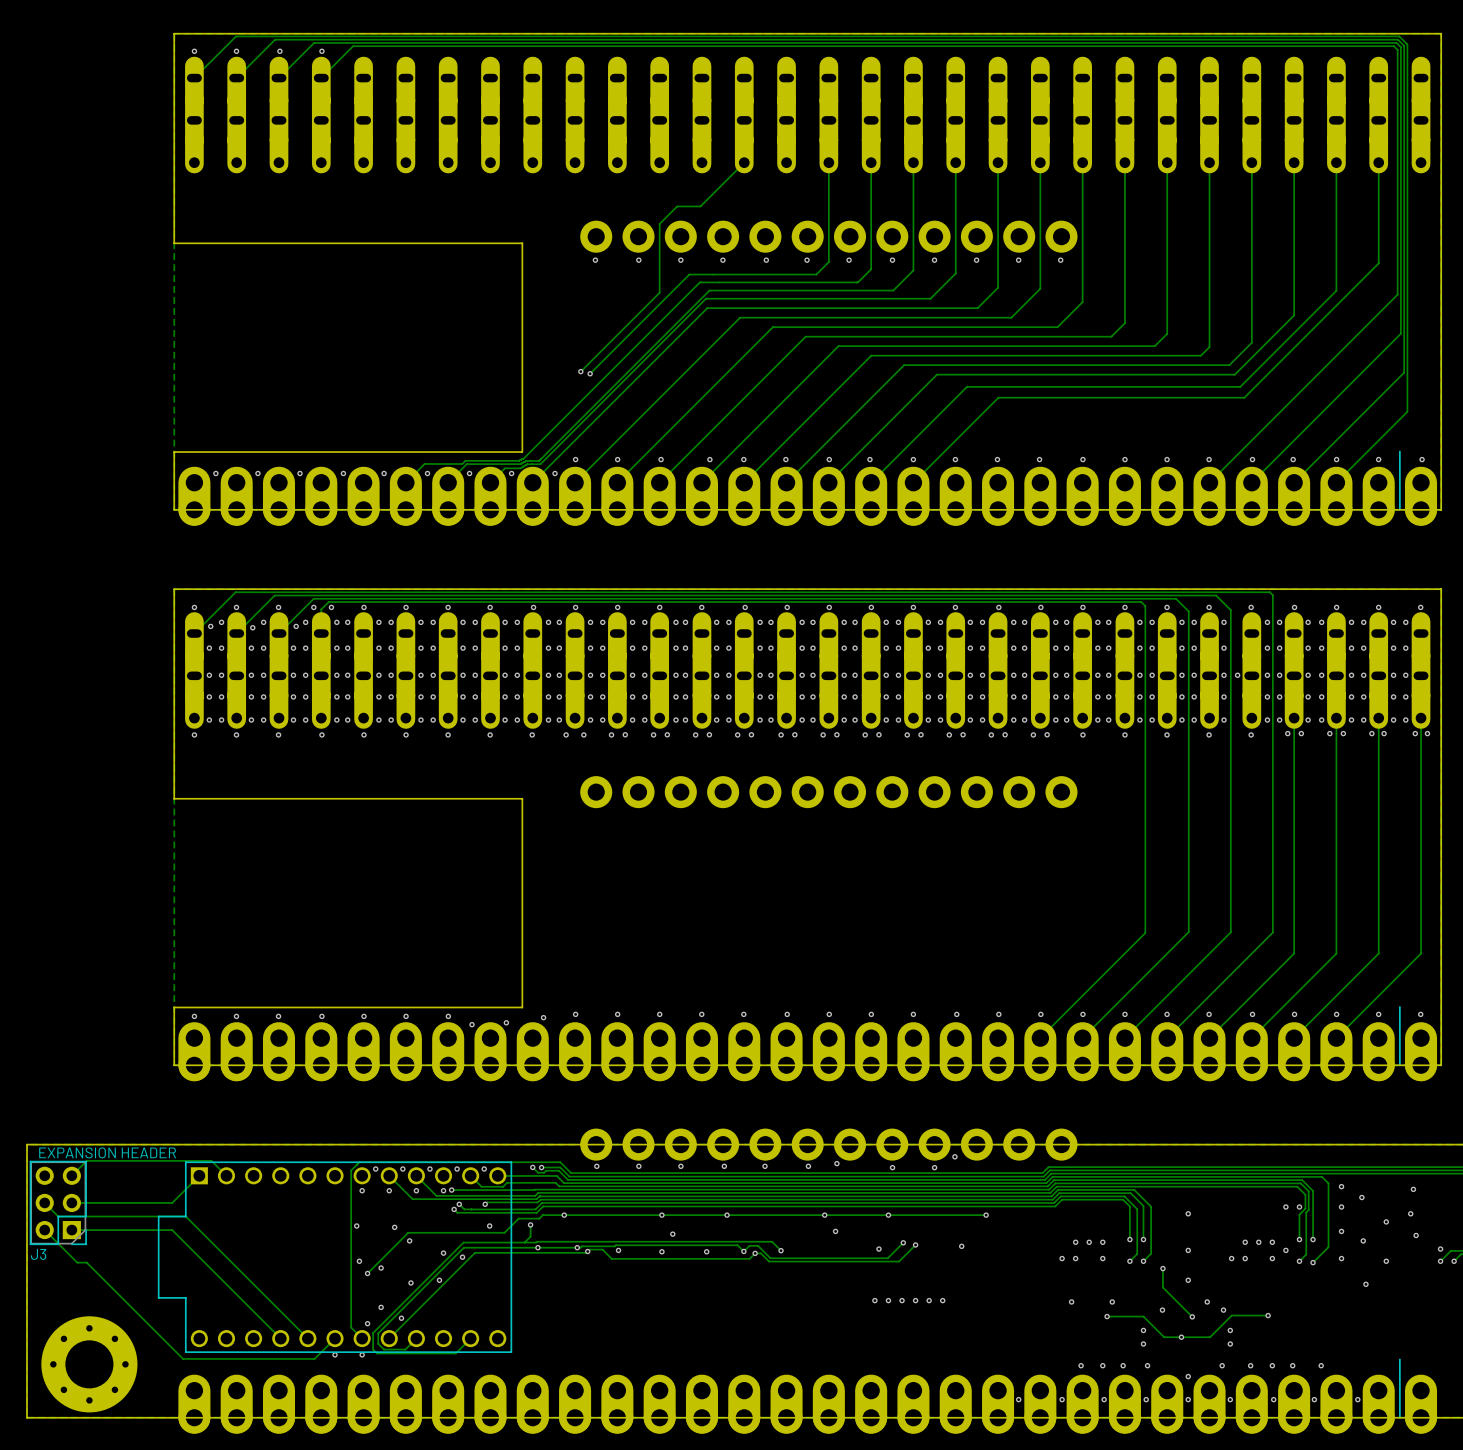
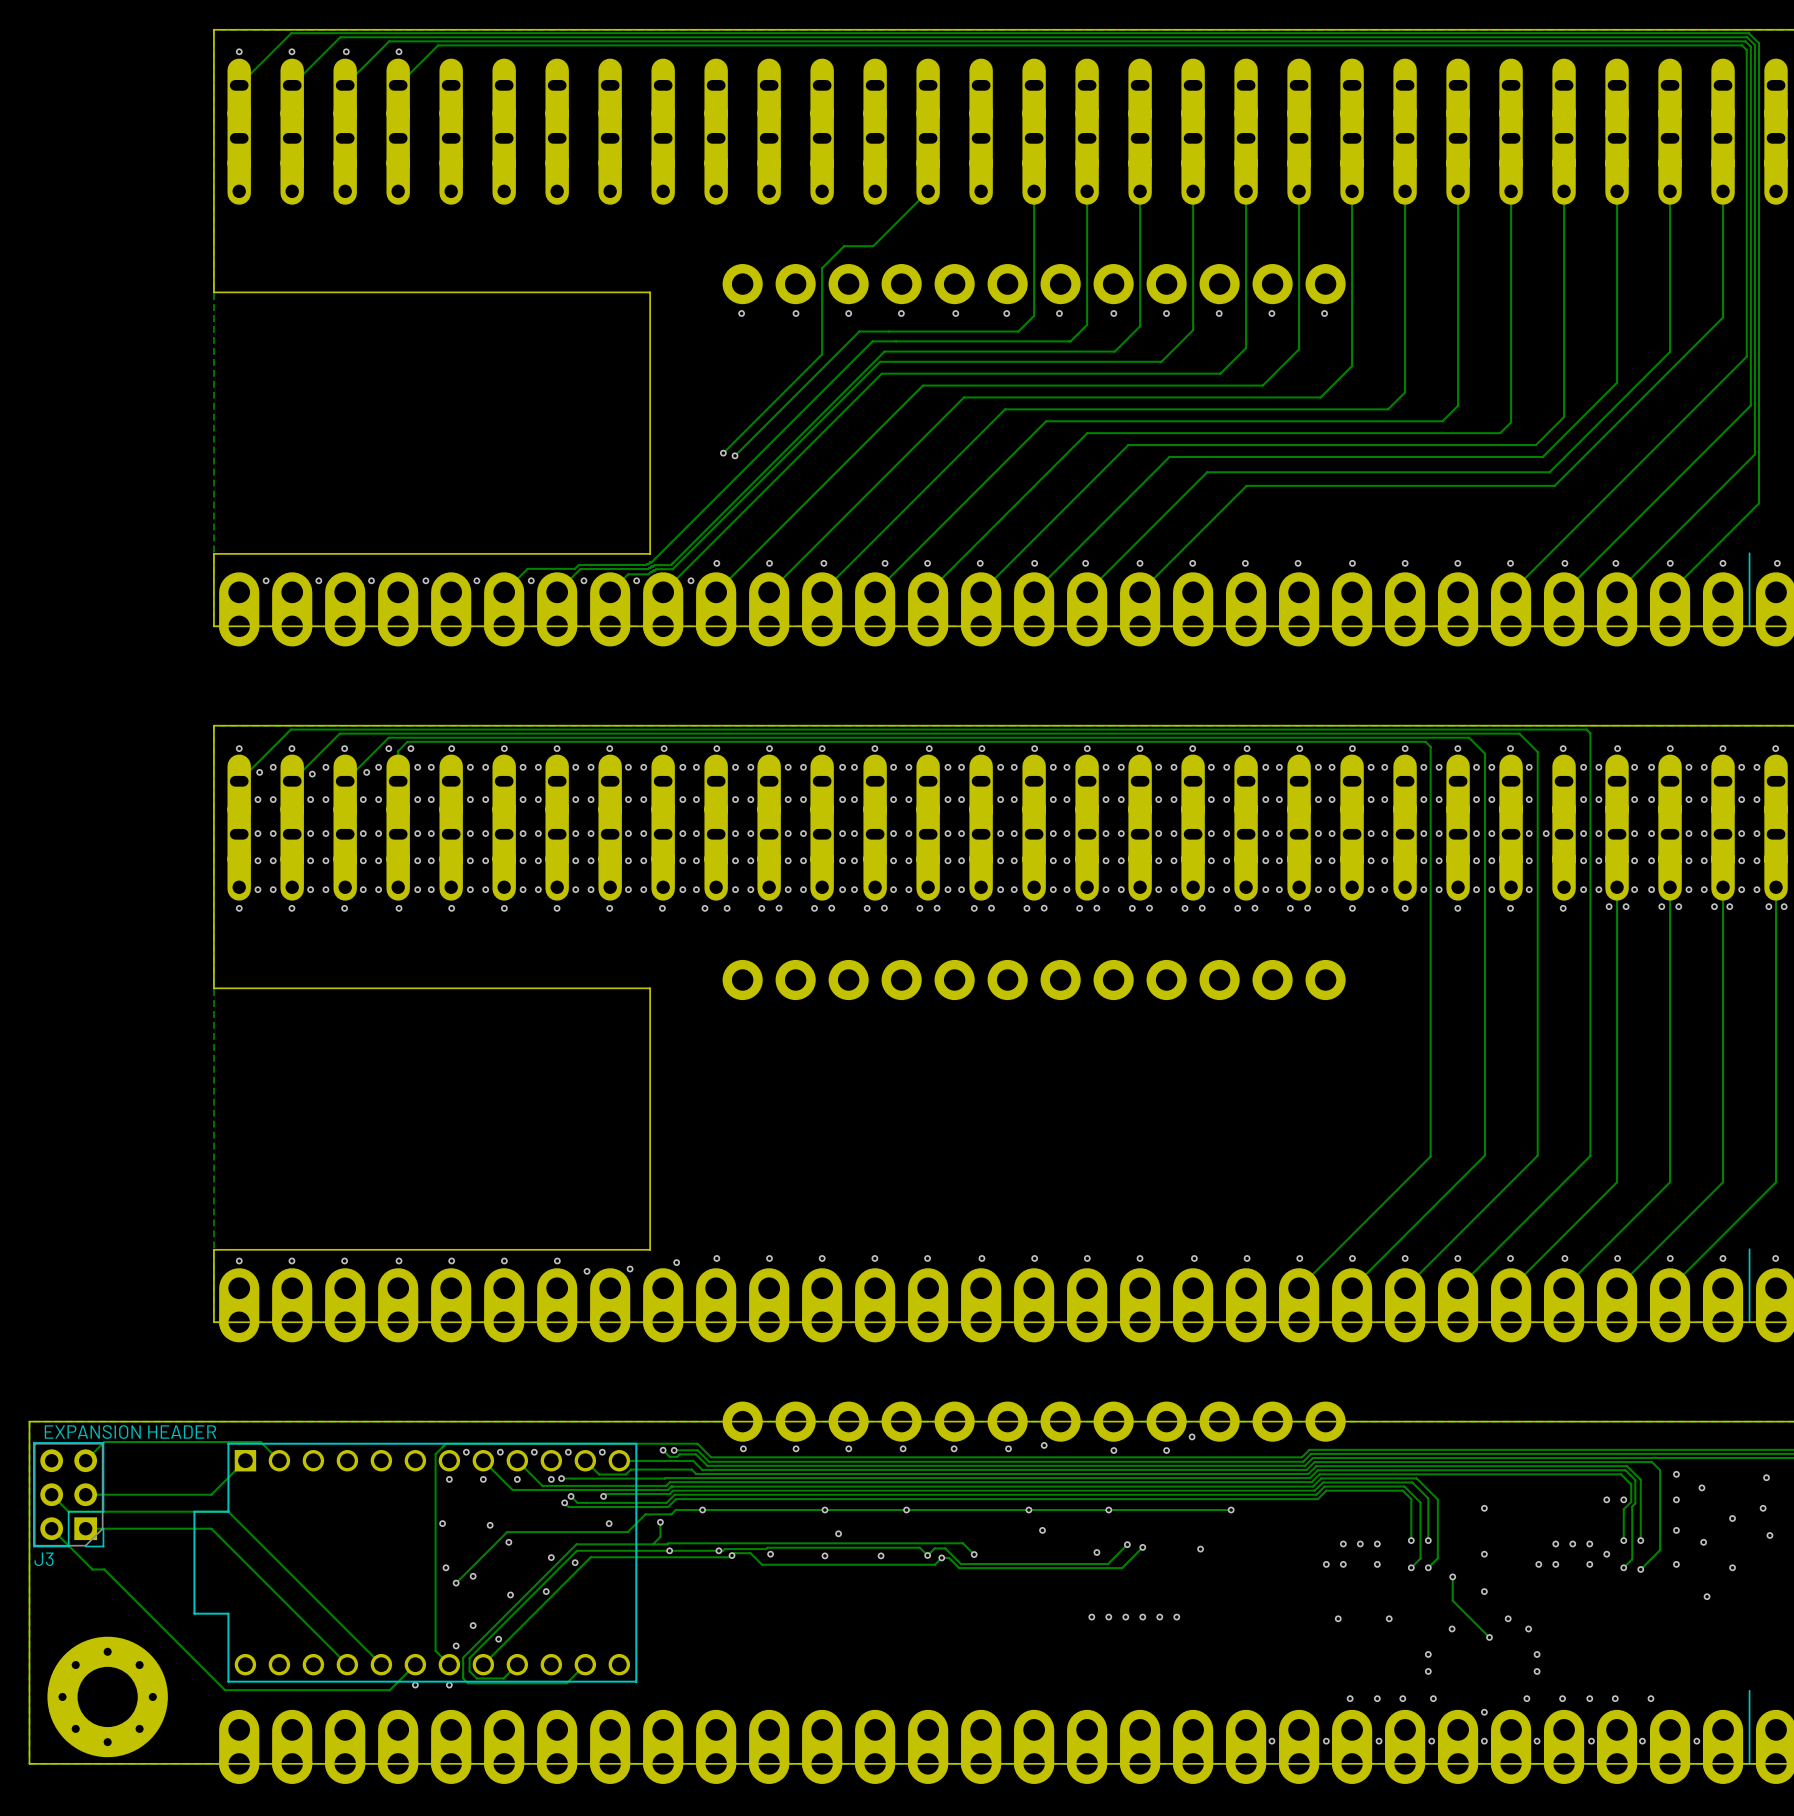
track: (1268, 1315) (1231, 1315) (1210, 1337) (1164, 1337) (1143, 1316) (1107, 1316) -> none
via: (1268, 1315) -> none
via: (1107, 1316) -> none
via: (1181, 1337) -> none

